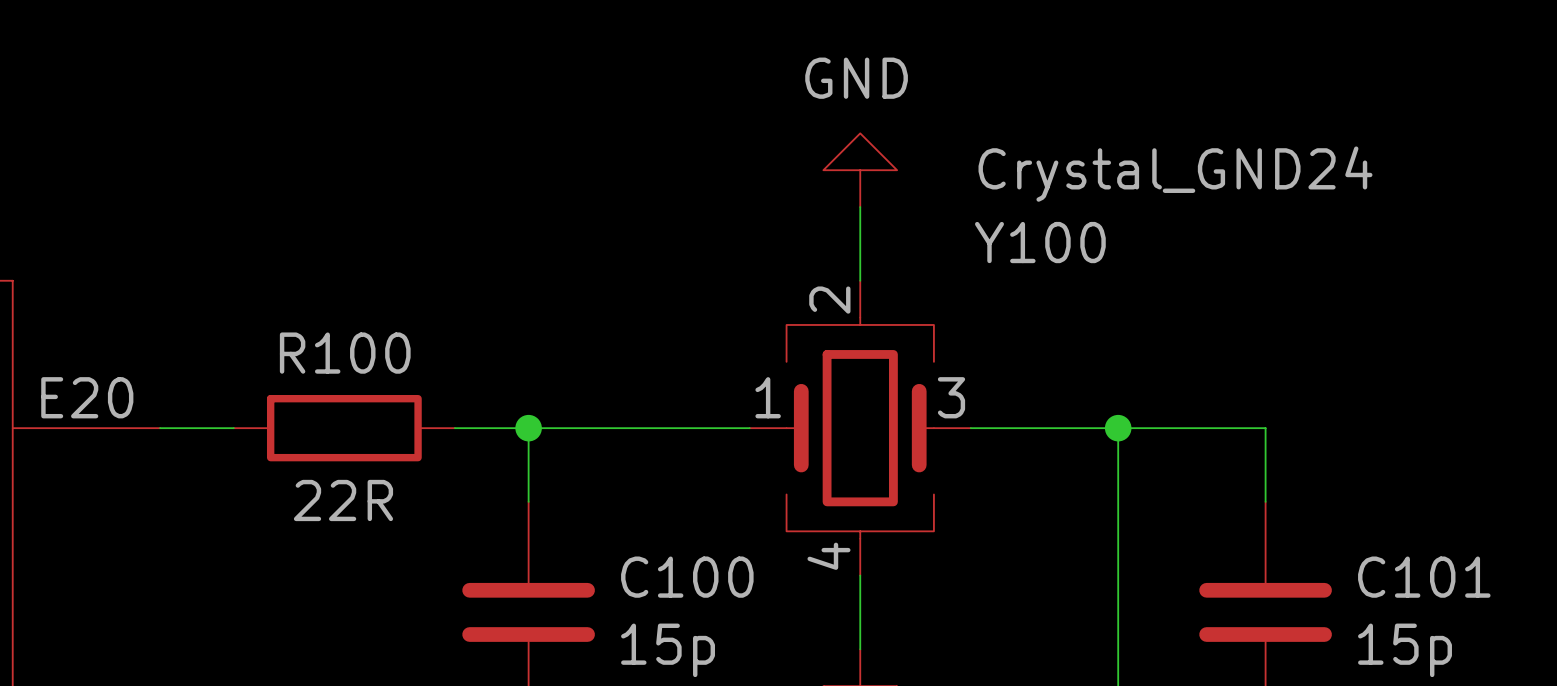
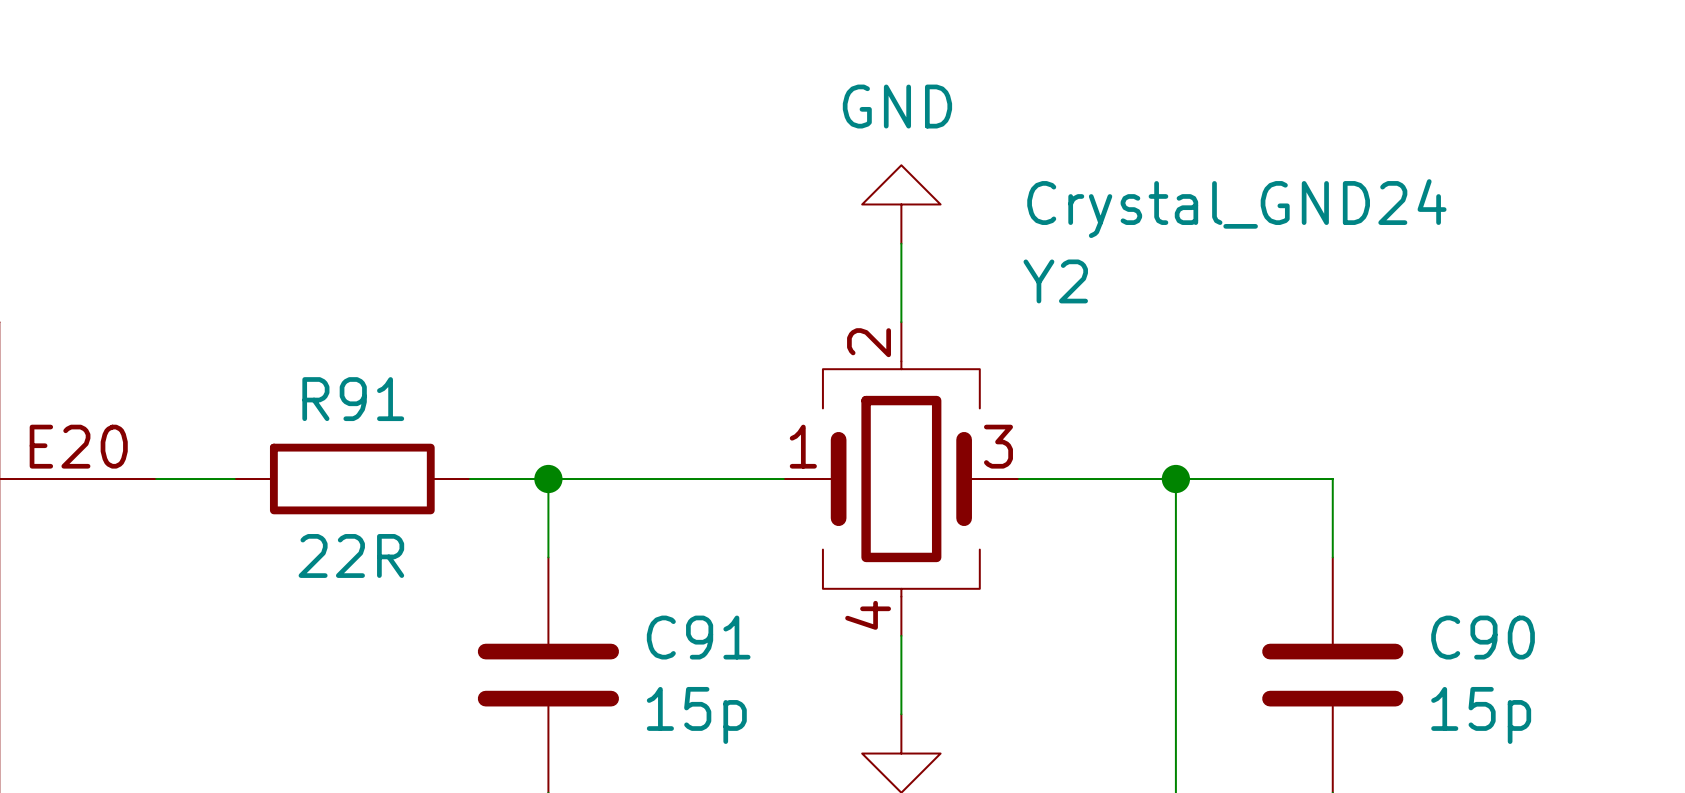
Y100 name: Y100 (1040, 242) -> Y2 (1055, 281)
R100 name: R100 (345, 353) -> R91 (353, 399)
C100 name: C100 (687, 577) -> C91 (698, 637)
C101 name: C101 (1424, 577) -> C90 (1483, 637)

